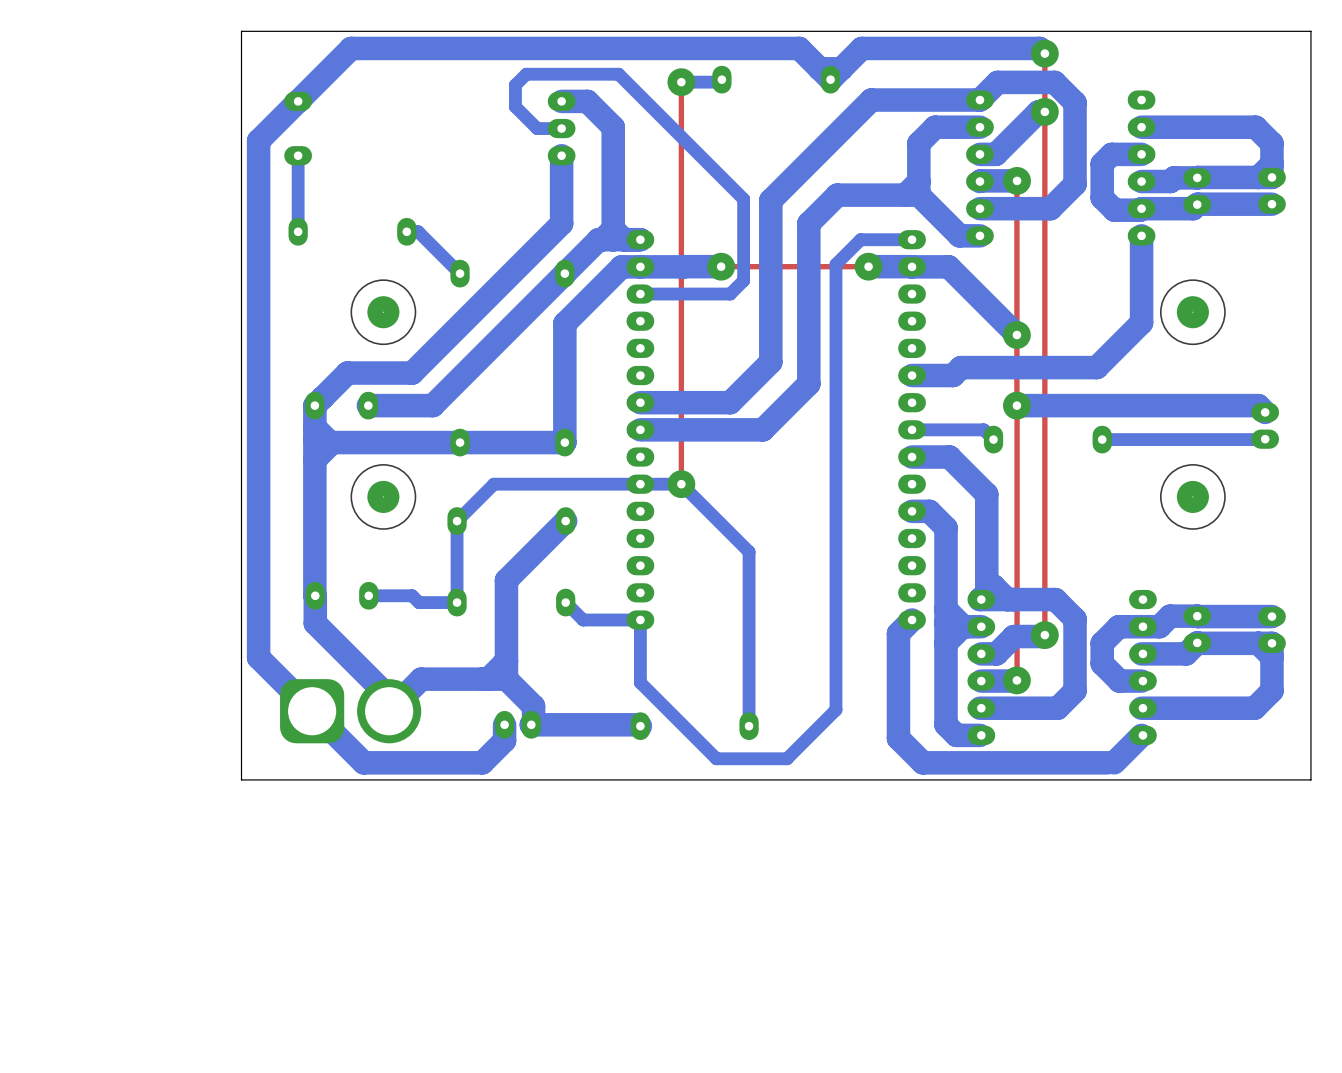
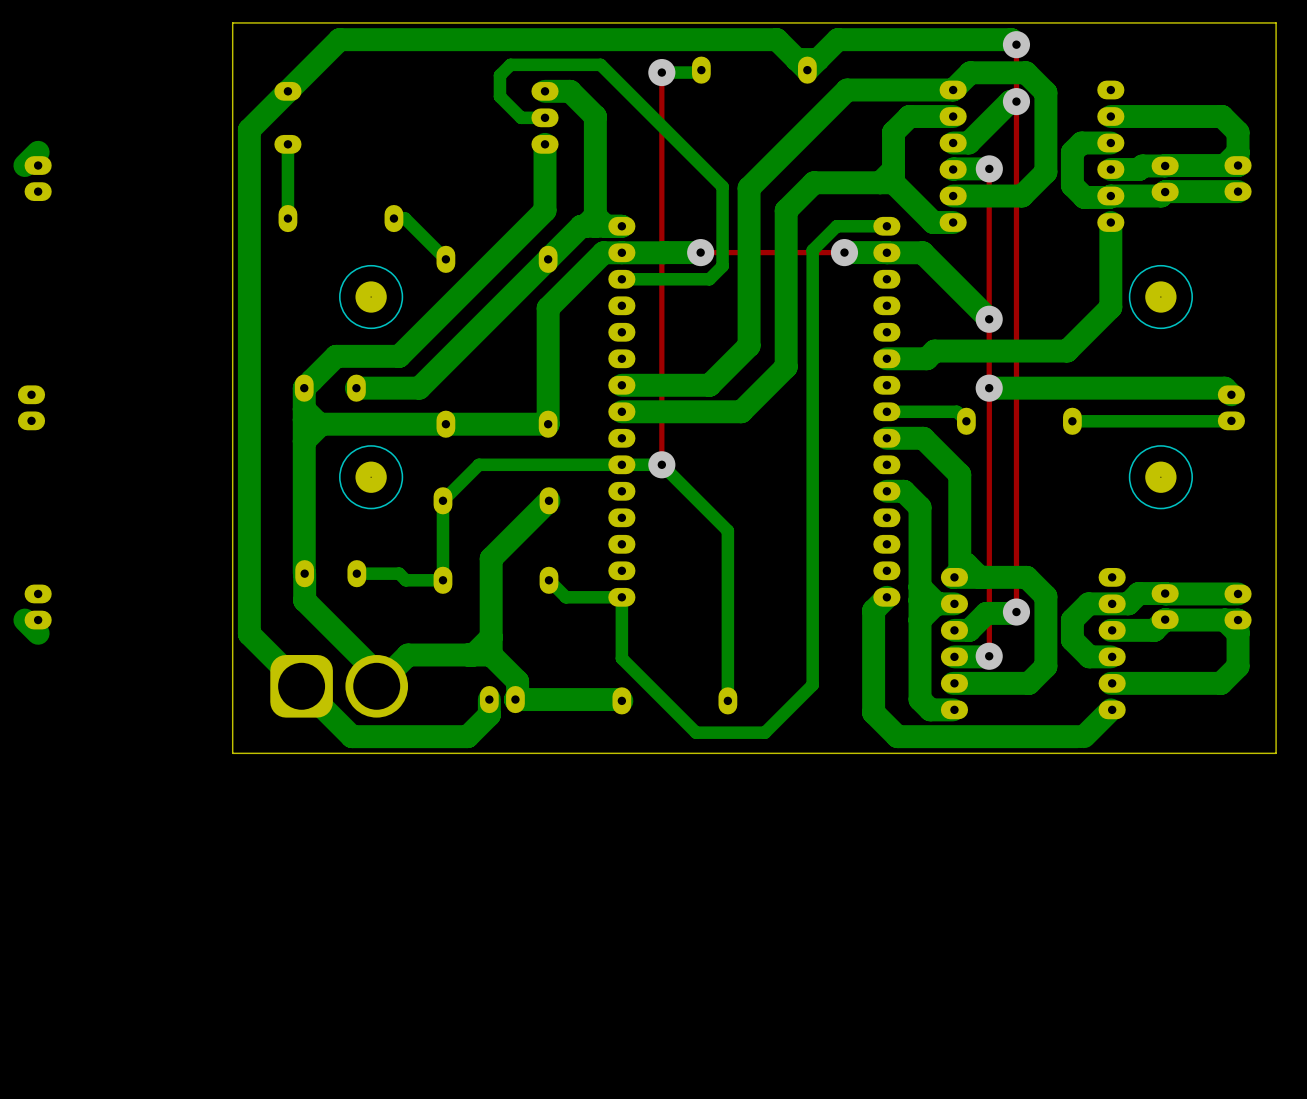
bottom track: none -> (38, 152) (24, 165)
part: none -> (38, 178)
part: none -> (31, 407)
part: none -> (38, 607)
bottom track: none -> (24, 620) (38, 633)

